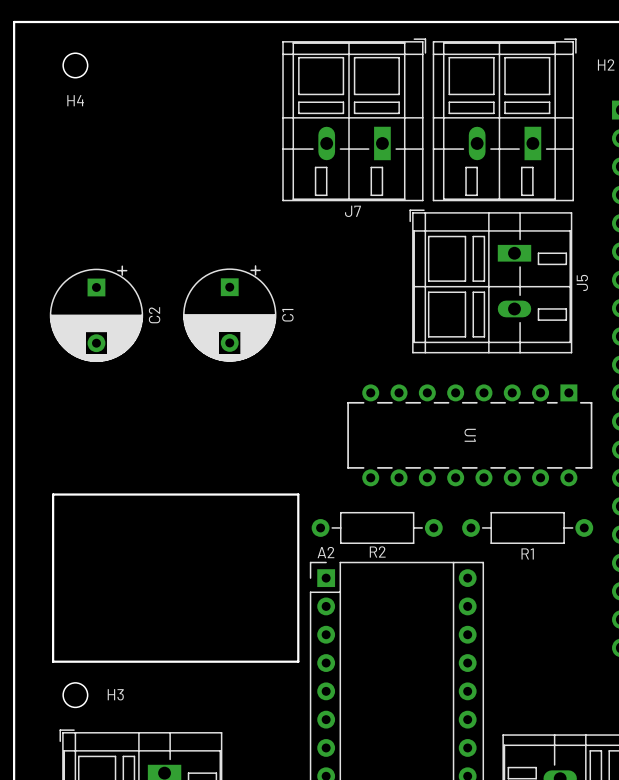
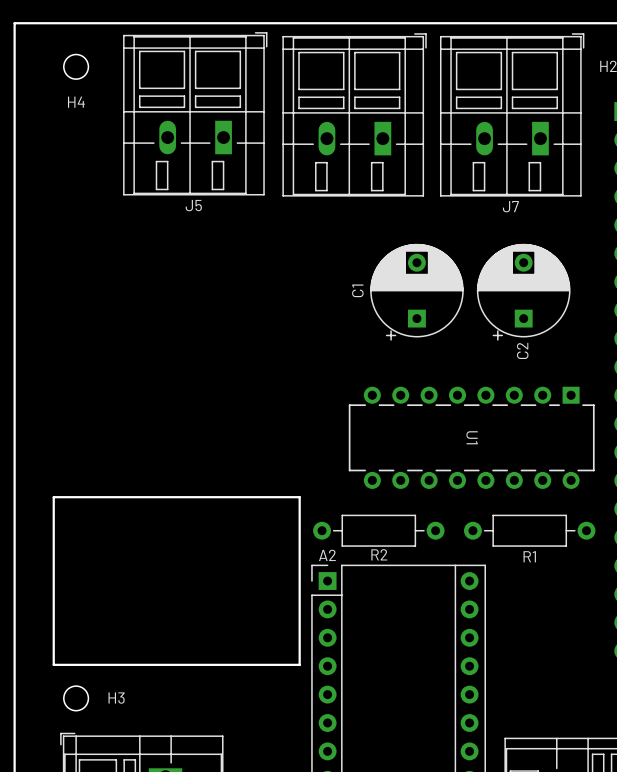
J7 position: (354, 119) -> (512, 114)
part position: (504, 119) -> (354, 114)
J5 rotation: 0° (490, 281) -> 90° clockwise (195, 113)
J5 position: (490, 281) -> (195, 113)
C2 rotation: 0° (96, 313) -> 180° (523, 292)
C2 position: (96, 313) -> (523, 292)
C1 rotation: 0° (229, 313) -> 180° (416, 292)
C1 position: (229, 313) -> (416, 292)
C2 name position: C2 (154, 315) -> C2 (522, 350)

